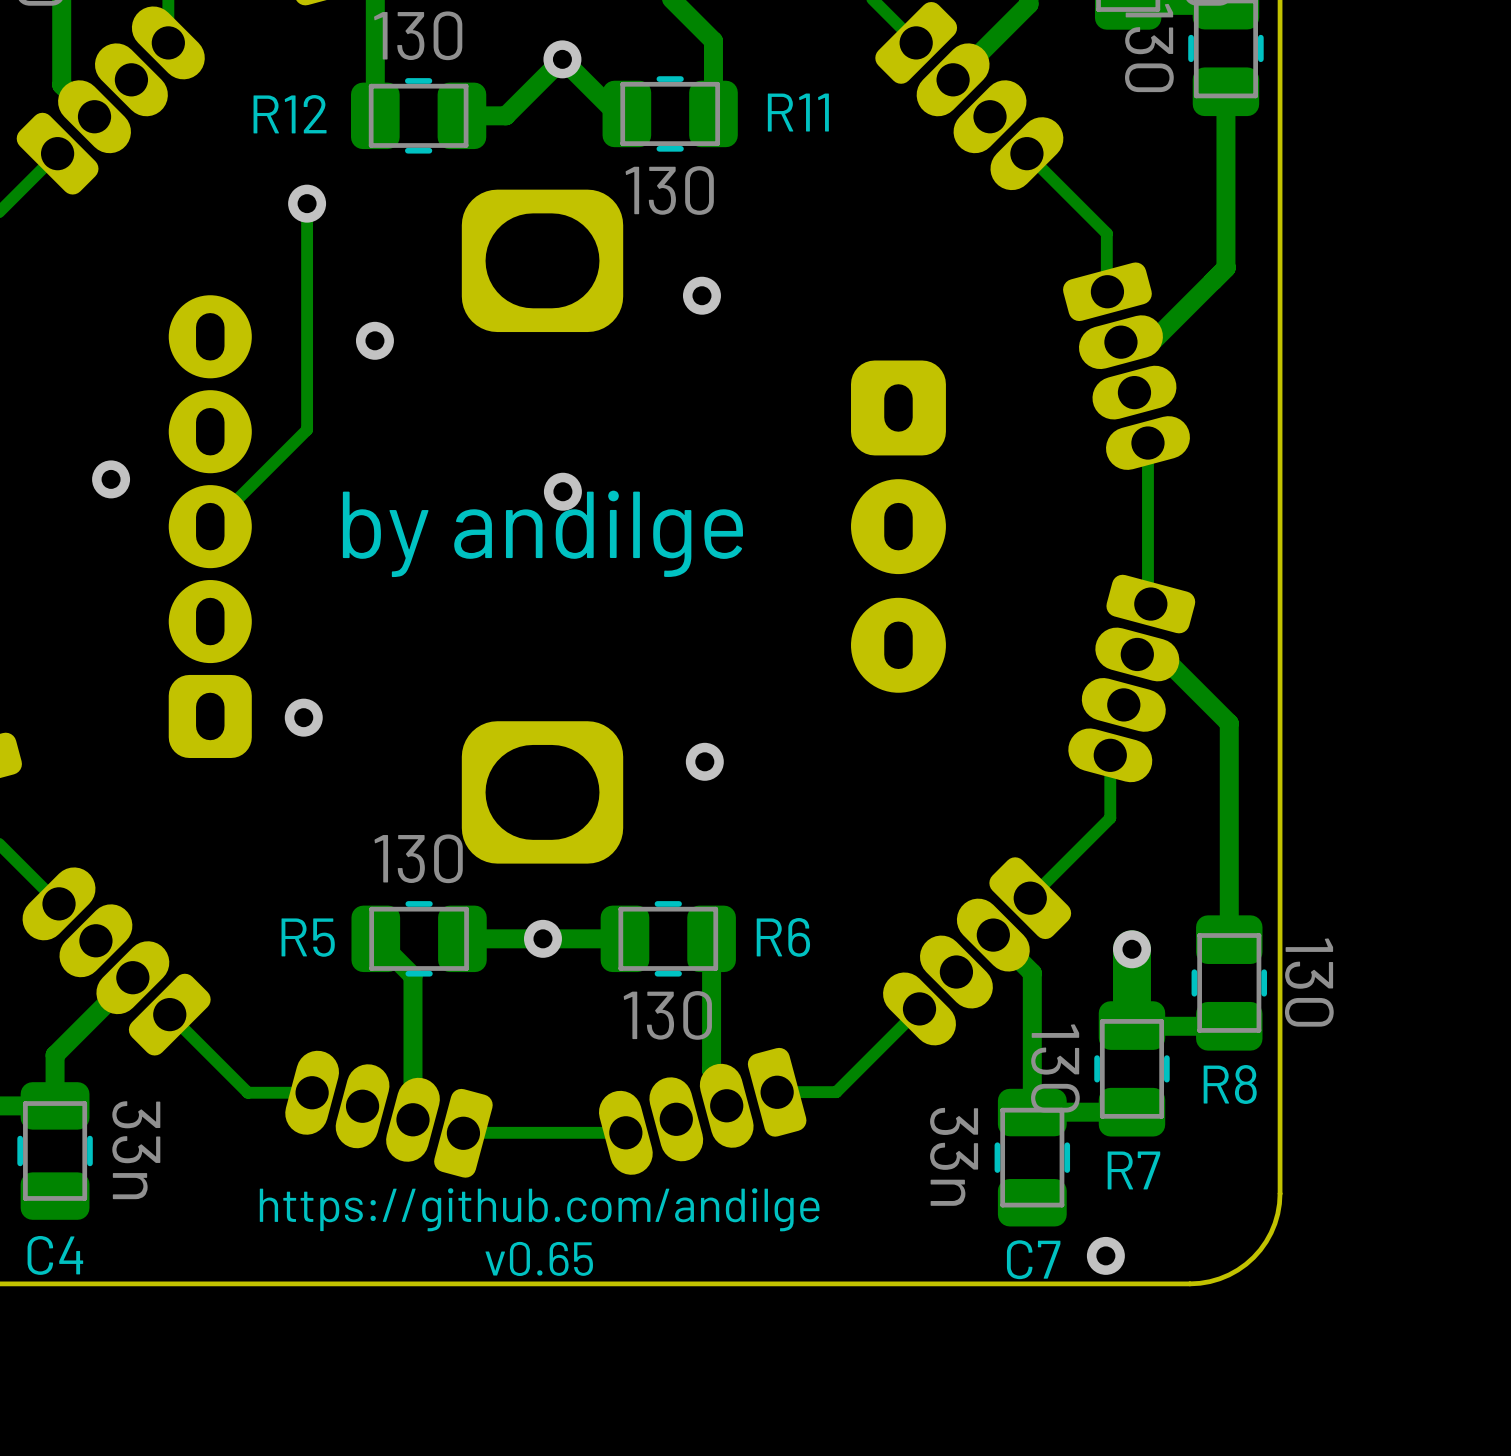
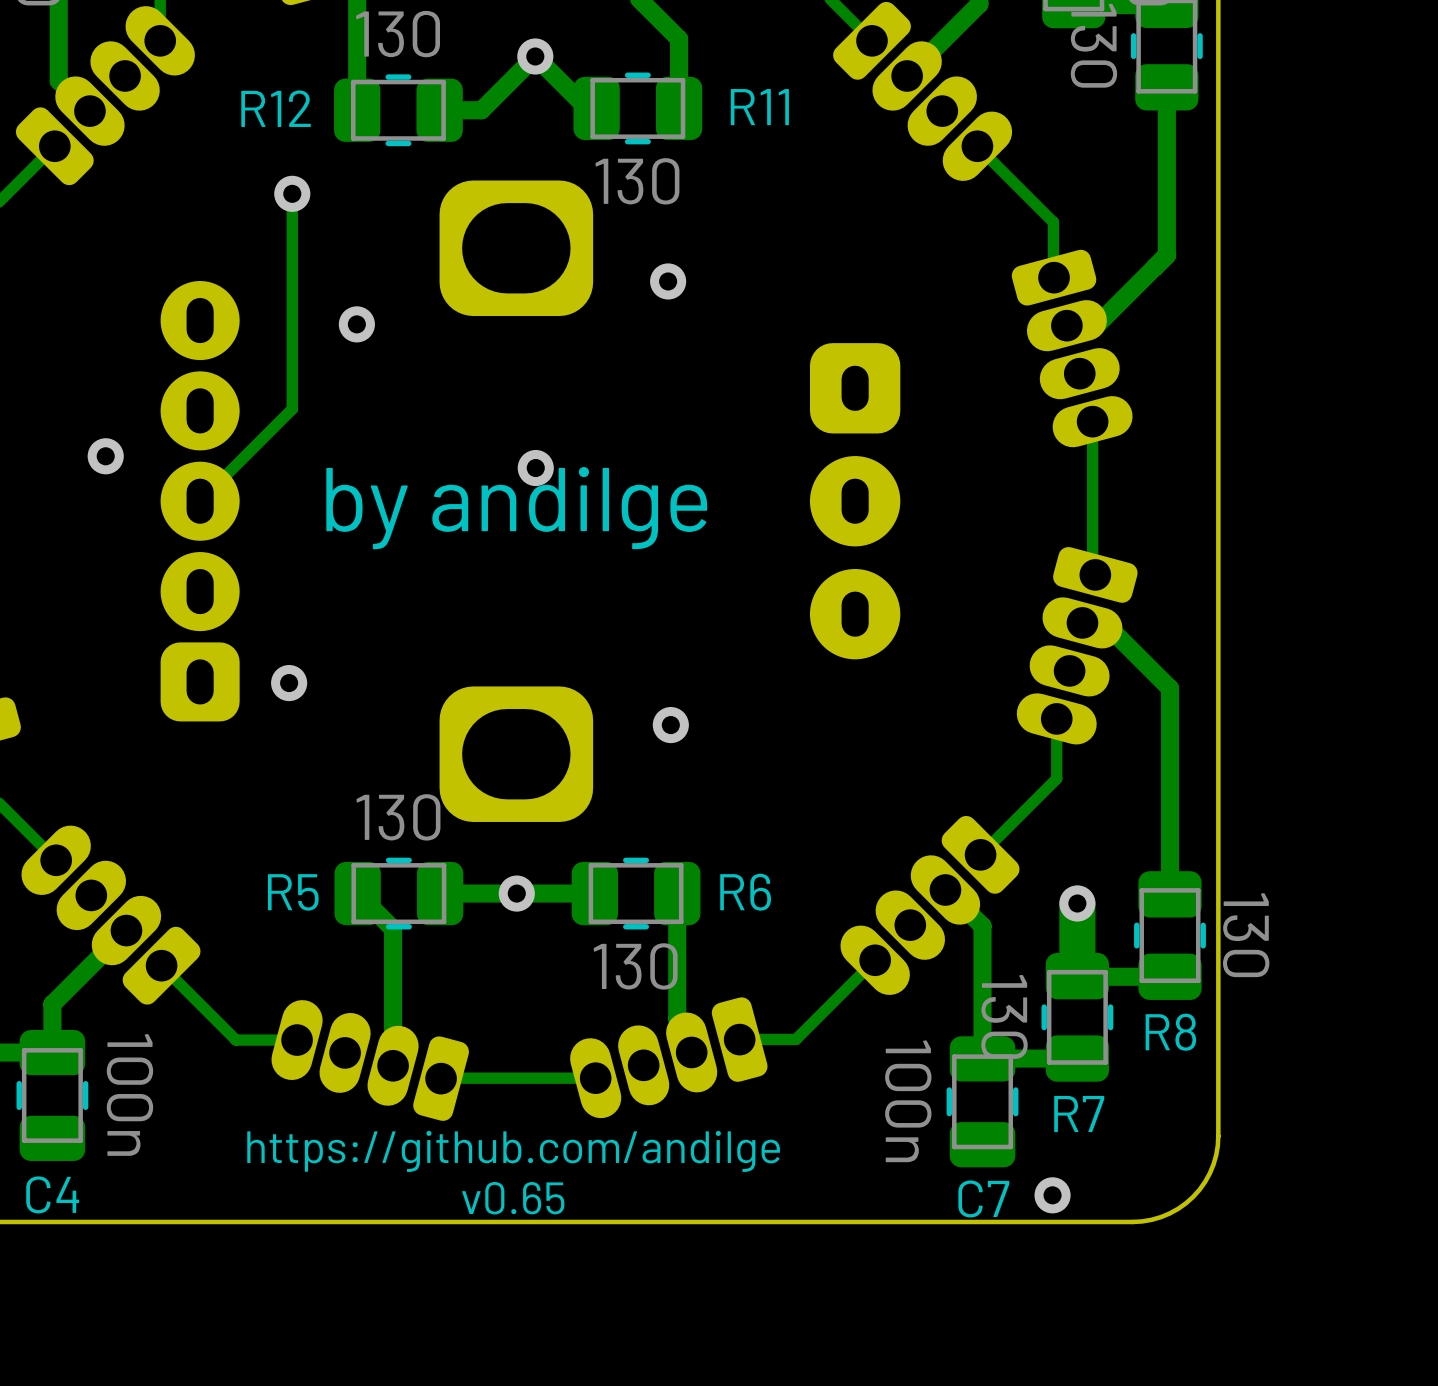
C4 value: 33n (136, 1150) -> 100n (129, 1094)
C7 value: 33n (954, 1156) -> 100n (908, 1101)

